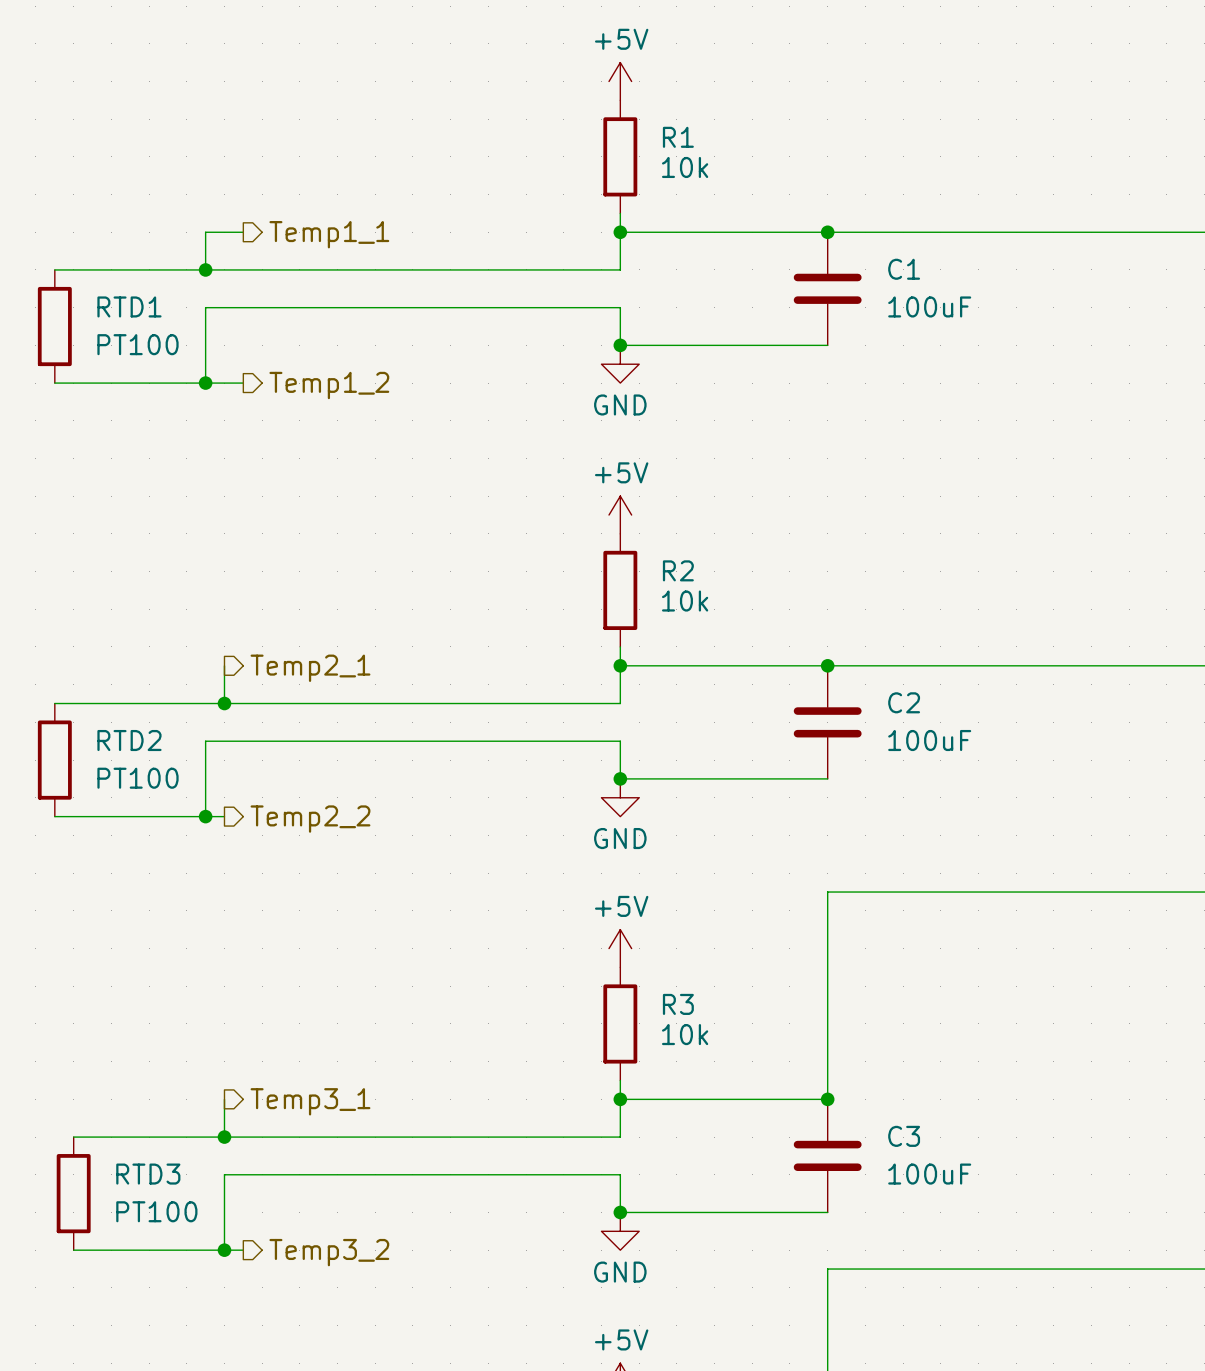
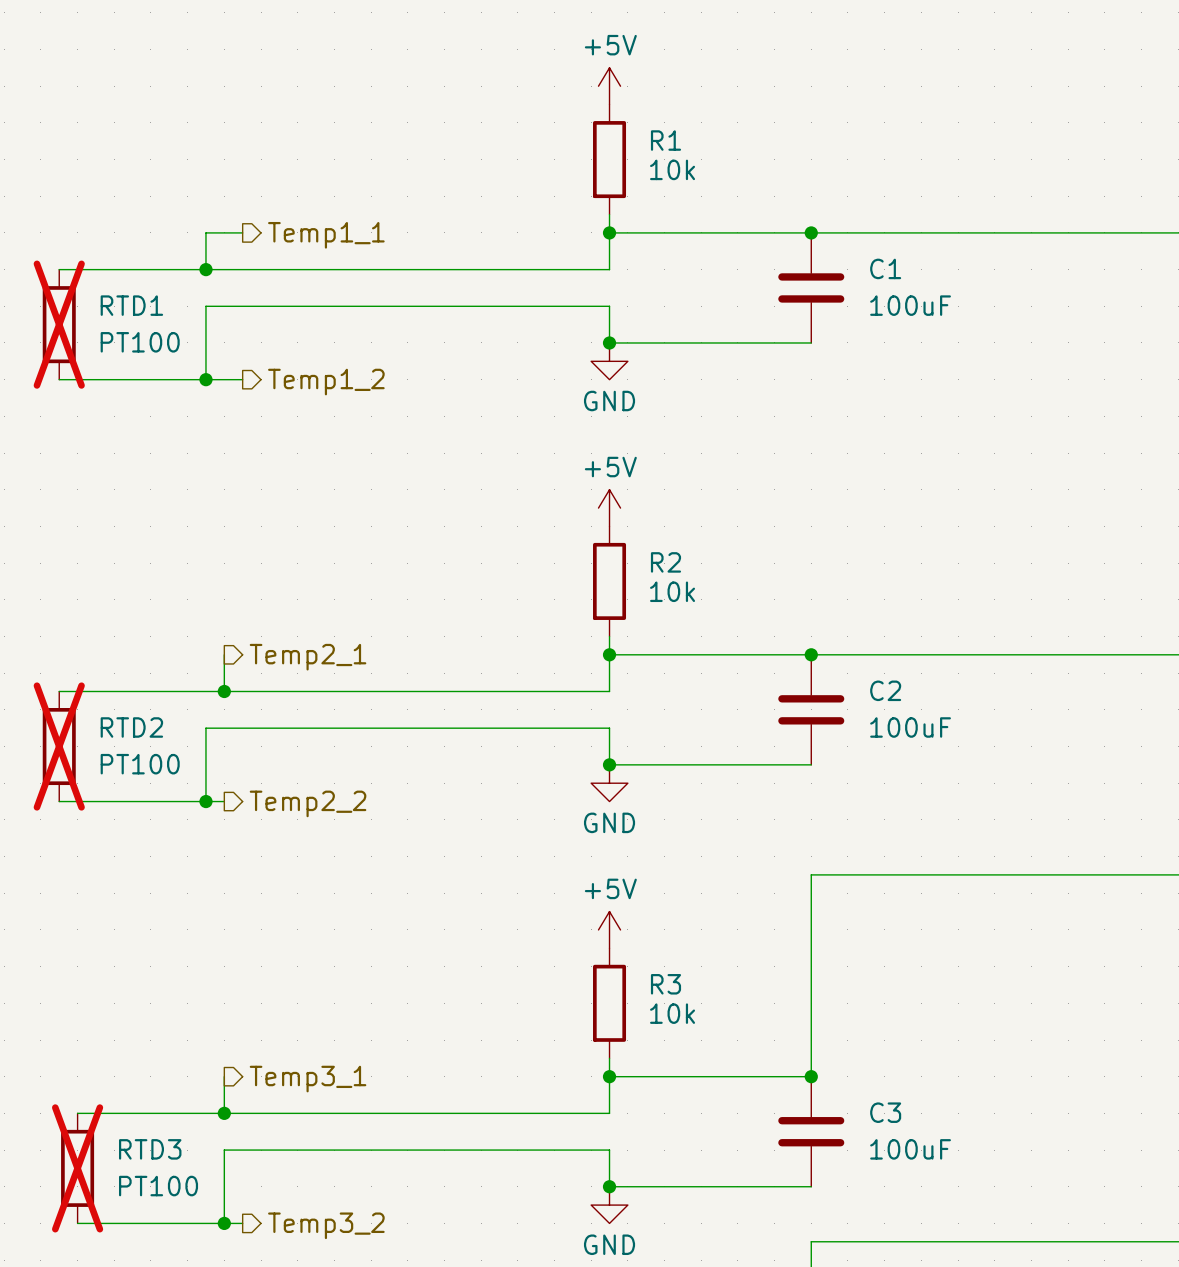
RTD1 do-not-place cross: none -> (59, 324)
RTD2 do-not-place cross: none -> (59, 746)
RTD3 do-not-place cross: none -> (77, 1168)

